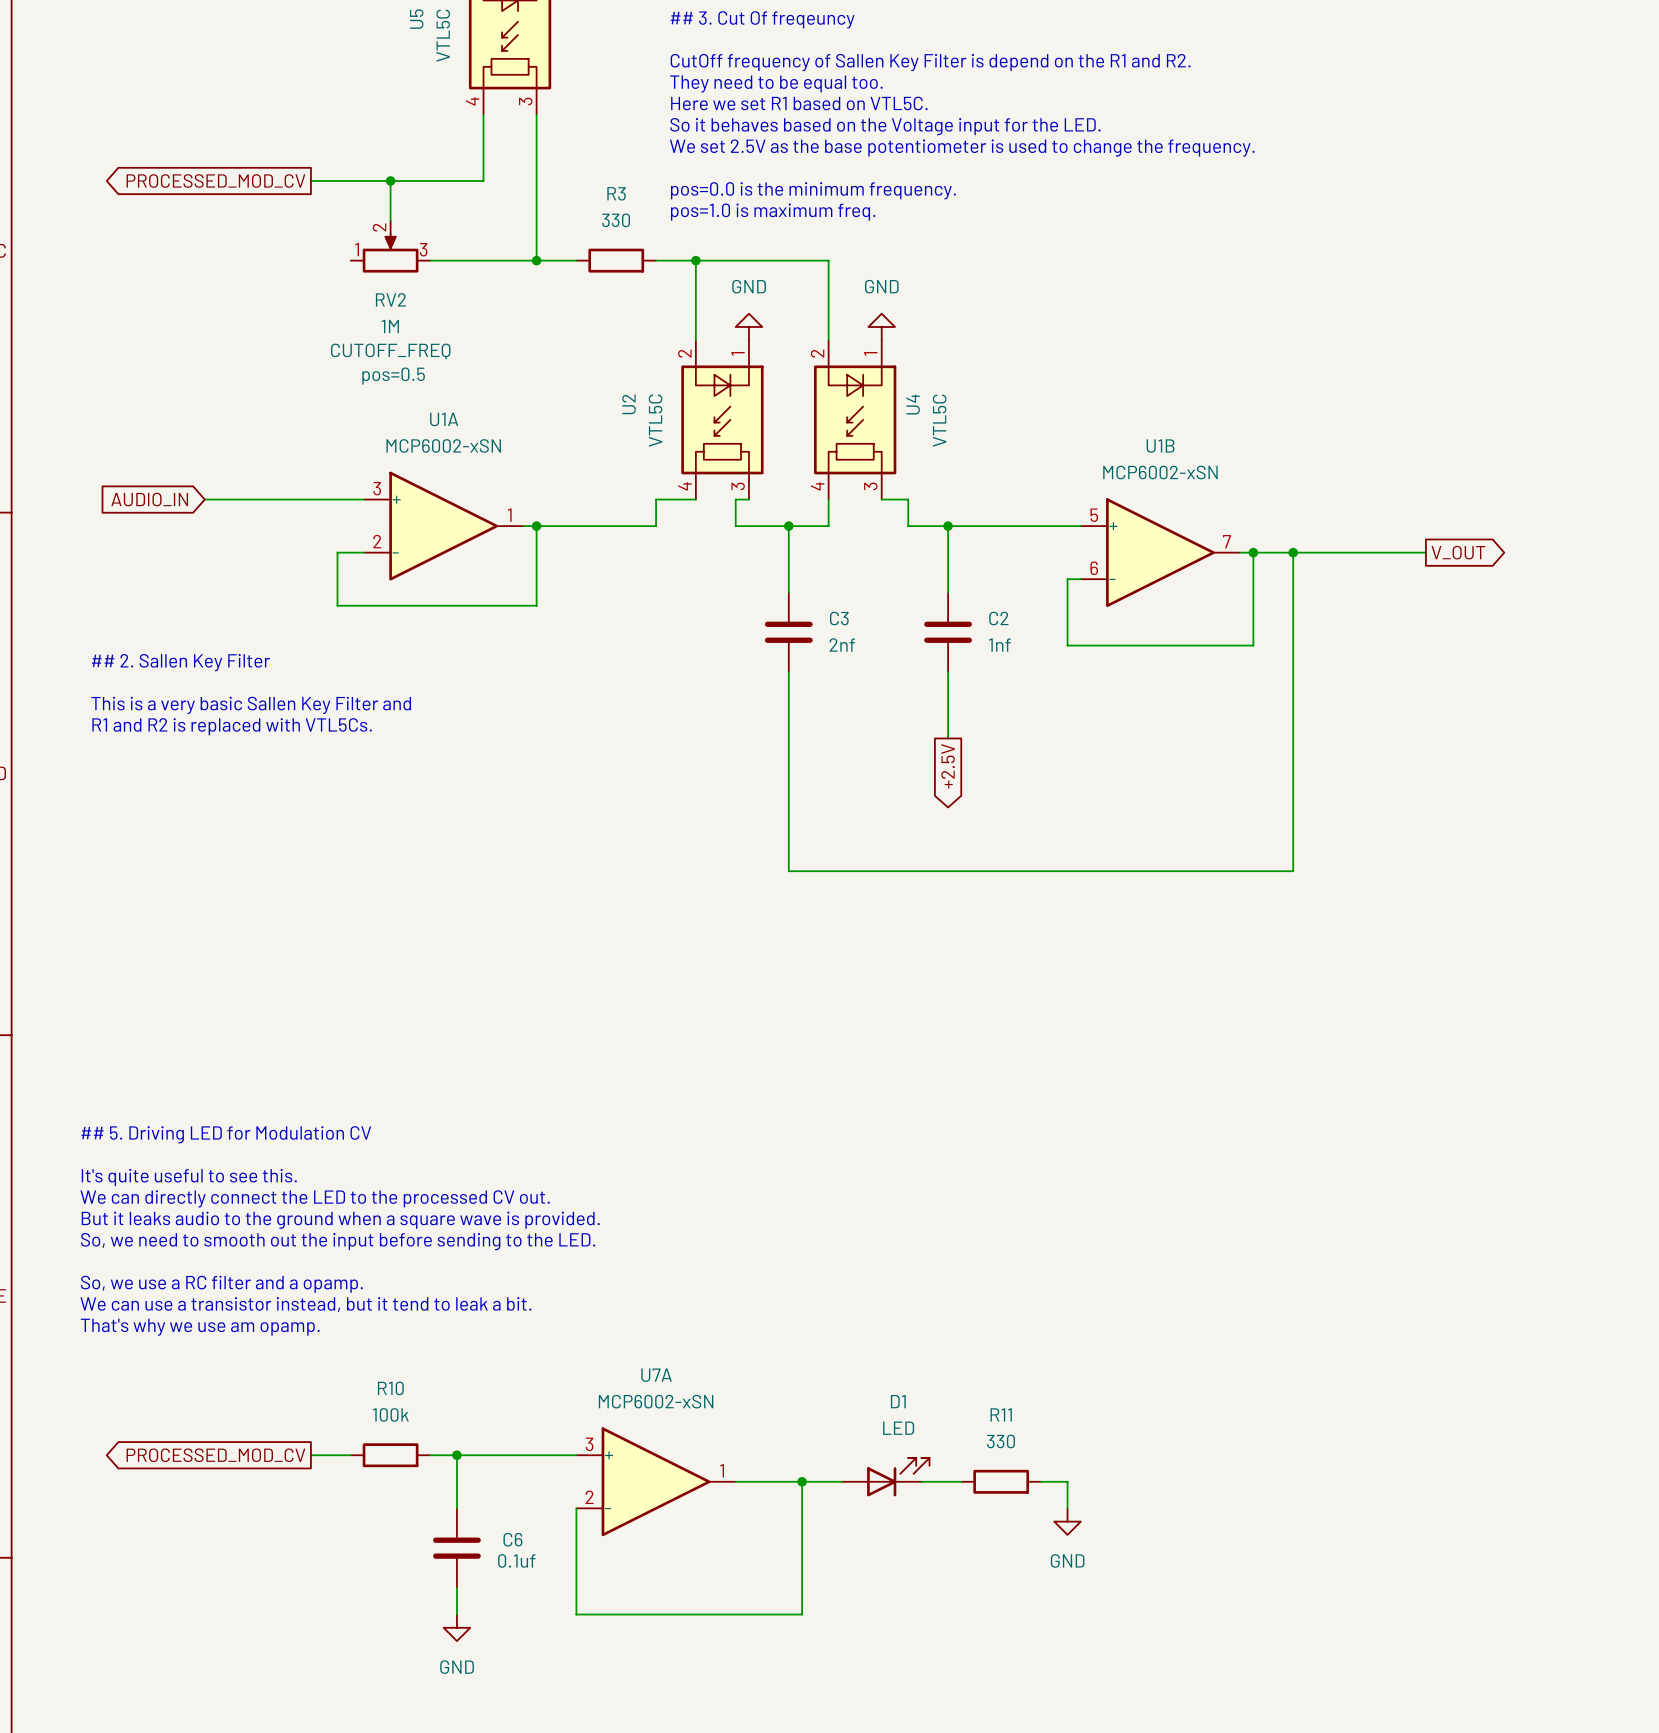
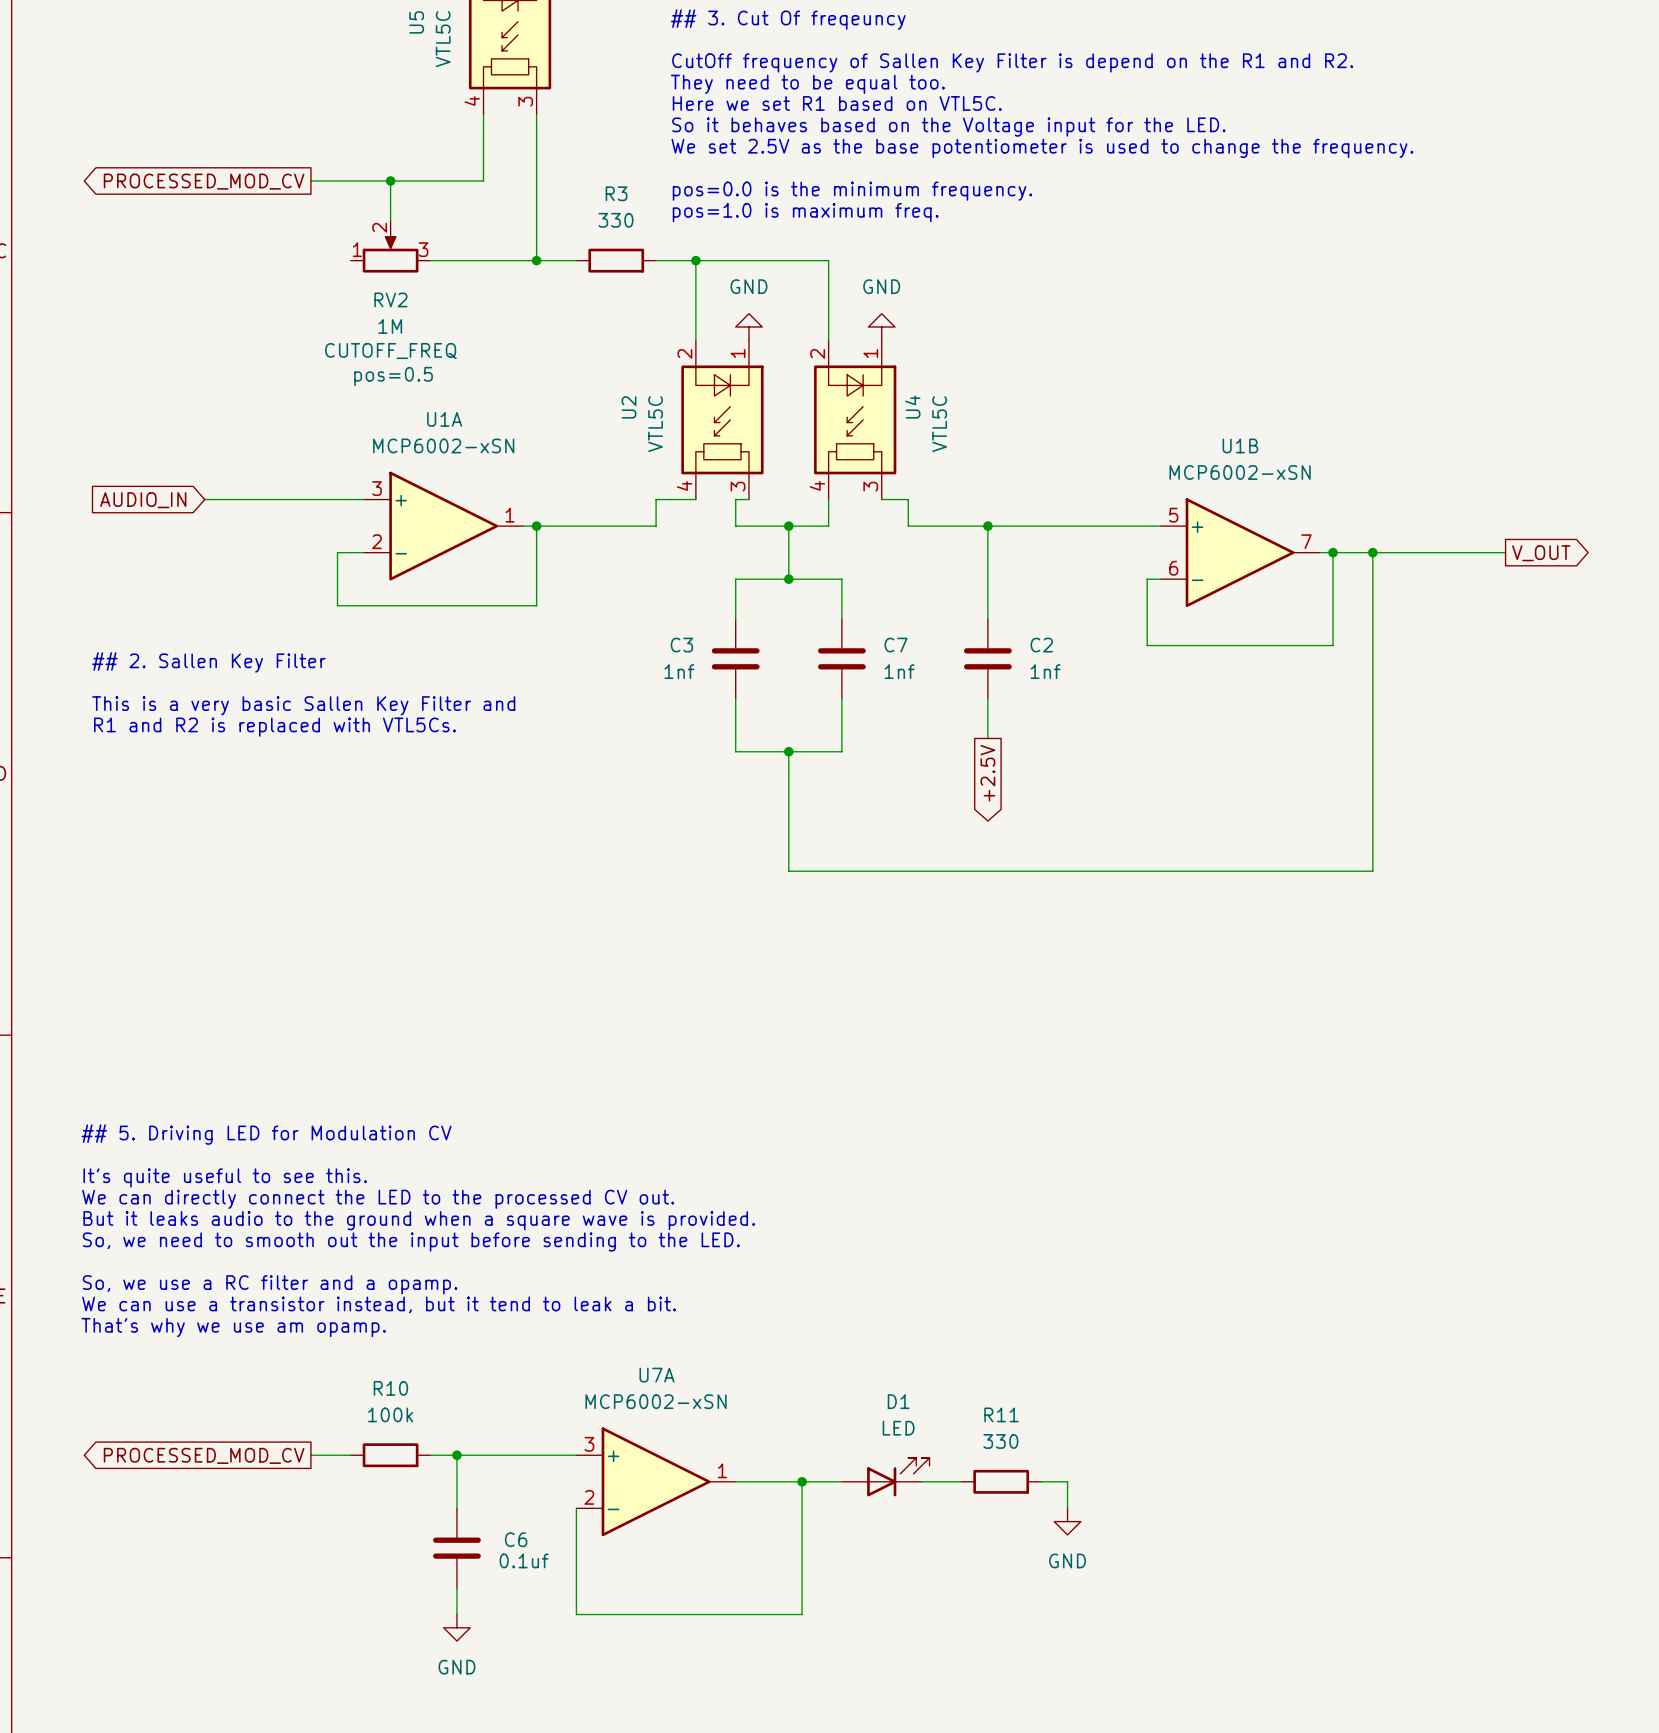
wire: (948, 526) (948, 592) -> none
junction position: (948, 526) -> (987, 526)
wire: none -> (987, 526) (987, 619)
U1B position: (1160, 552) -> (1240, 552)
wire: (1253, 552) (1253, 645) -> (1333, 552) (1333, 645) (1253, 645)
junction: (1253, 552) -> none
wire: (1293, 552) (1293, 871) -> (1372, 552) (1372, 871) (1293, 871)
junction: (1293, 552) -> none
junction: none -> (1333, 552)
junction: none -> (1372, 552)
wire: none -> (1425, 552) (1505, 552)
global label position: V_OUT (1458, 552) -> V_OUT (1541, 553)
wire: (788, 579) (788, 592) -> none
junction: none -> (788, 579)
wire: (1080, 579) (1067, 579) (1067, 645) (1147, 645) -> (1160, 579) (1147, 579) (1147, 645)
C3 name position: C3 (839, 618) -> C3 (681, 645)
wire: none -> (735, 619) (735, 579) (841, 579) (841, 619)
C3 position: (788, 632) -> (735, 658)
C2 position: (948, 632) -> (987, 658)
C3 value: 2nf (842, 644) -> 1nf (679, 671)
C7: none -> 1nf (841, 658)
wire: (788, 672) (788, 751) -> none
wire: (948, 672) (948, 738) -> none
wire: none -> (735, 698) (735, 751) (841, 751) (841, 698)
wire: none -> (987, 698) (987, 738)
junction: none -> (788, 751)
global label position: +2.5V (948, 766) -> +2.5V (987, 773)

